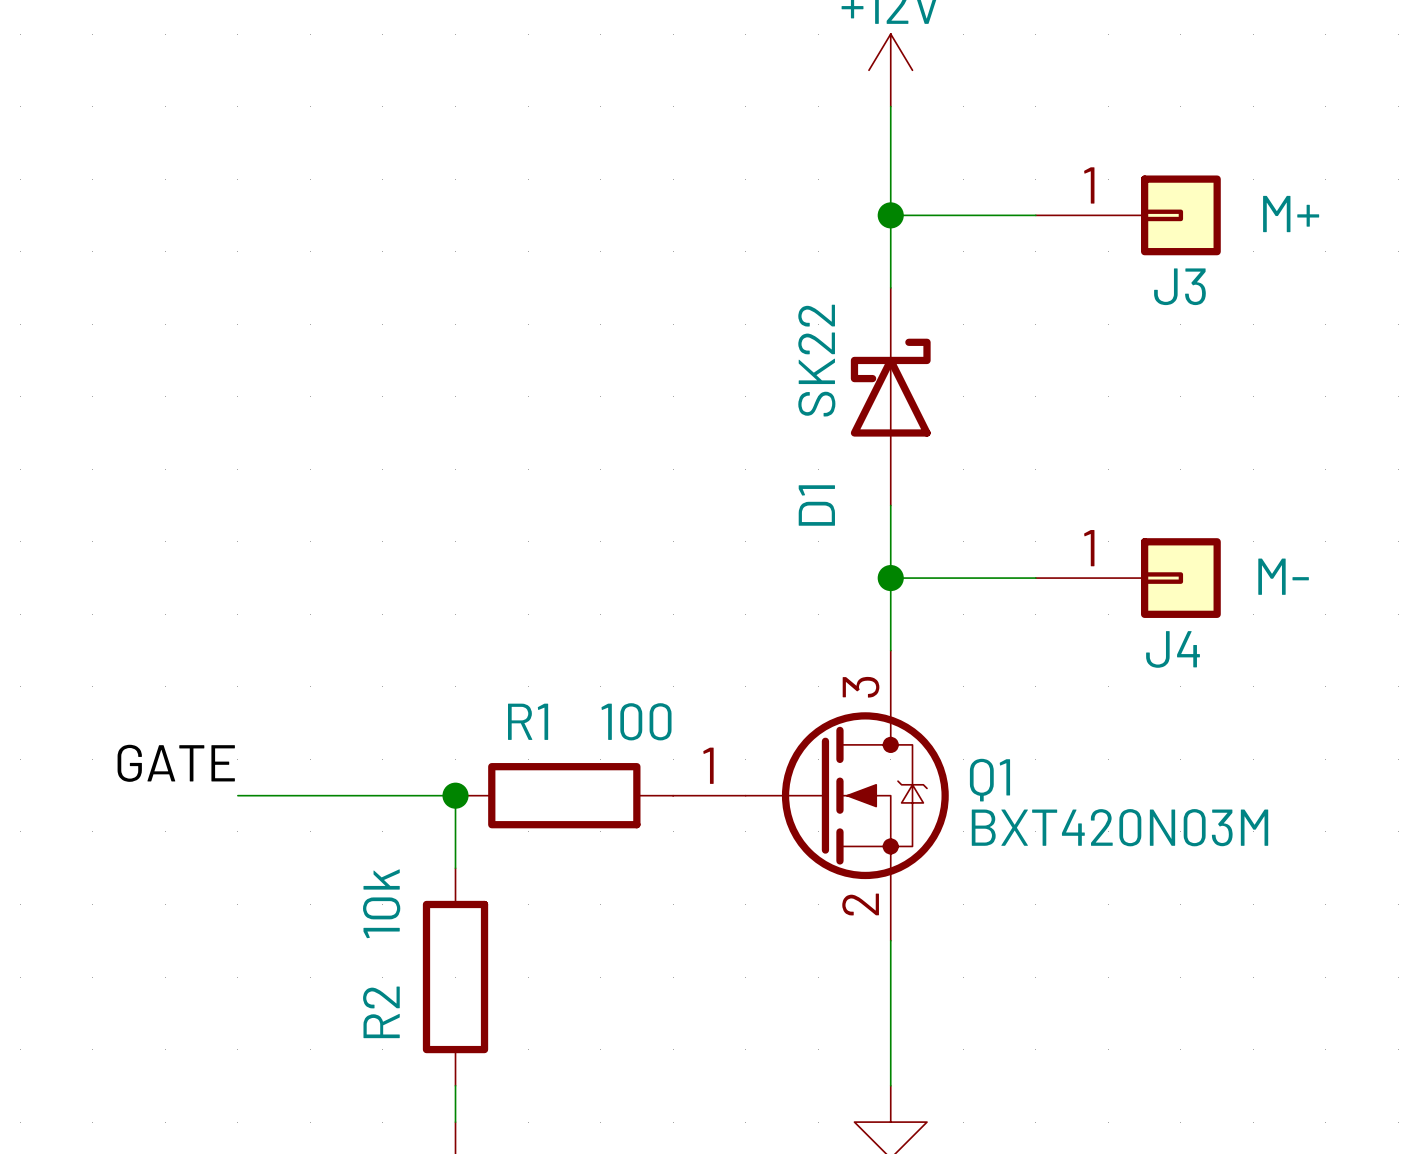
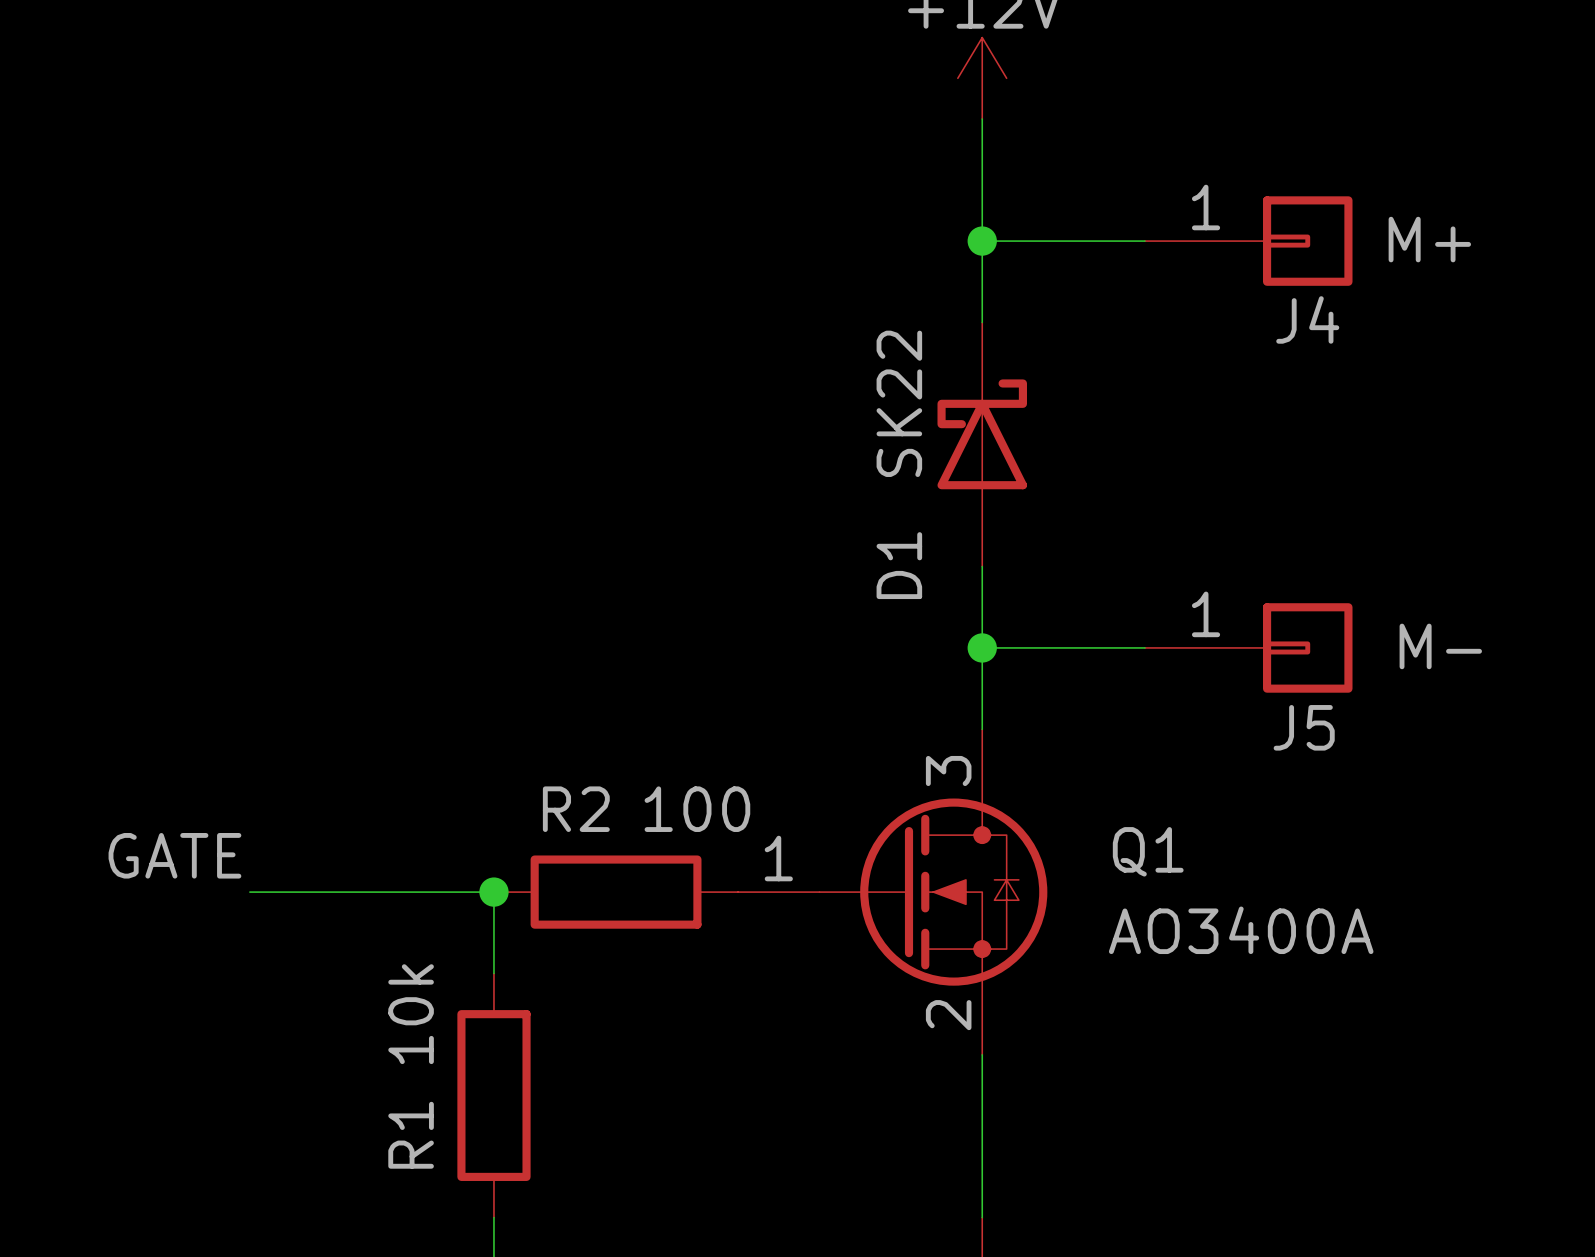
J3 name: J3 (1179, 286) -> J4 (1307, 319)
J4 name: J4 (1173, 649) -> J5 (1304, 727)
Q1 symbol: [673, 650, 949, 941] -> [738, 729, 1048, 1055]
R1 name: R1 (528, 721) -> R2 (576, 809)
Q1 name position: Q1 (989, 780) -> Q1 (1148, 851)
Q1 value: BXT420N03M (1119, 827) -> AO3400A (1241, 930)
R2 name: R2 (381, 1012) -> R1 (411, 1135)

